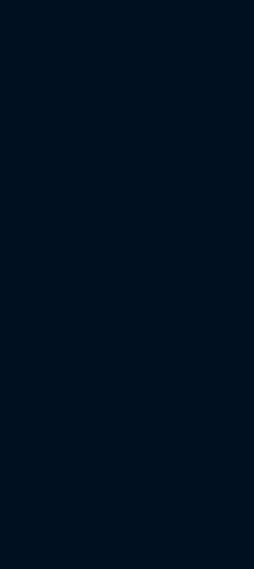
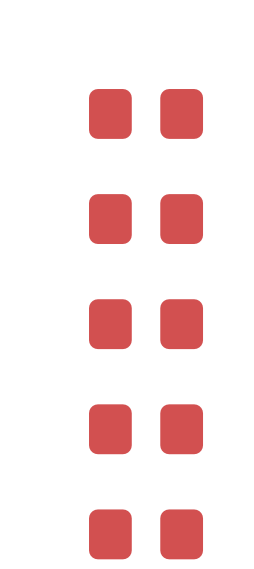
part: none -> (146, 113)
part: none -> (146, 219)
part: none -> (146, 324)
part: none -> (146, 429)
part: none -> (146, 534)

